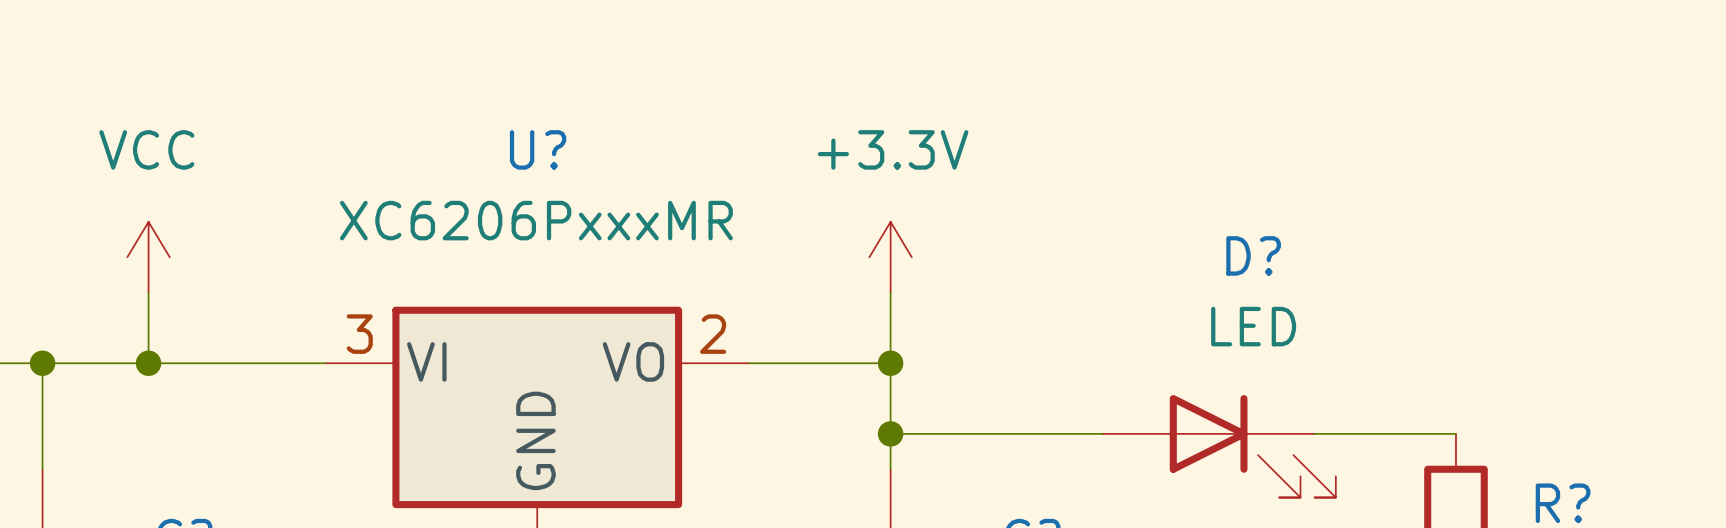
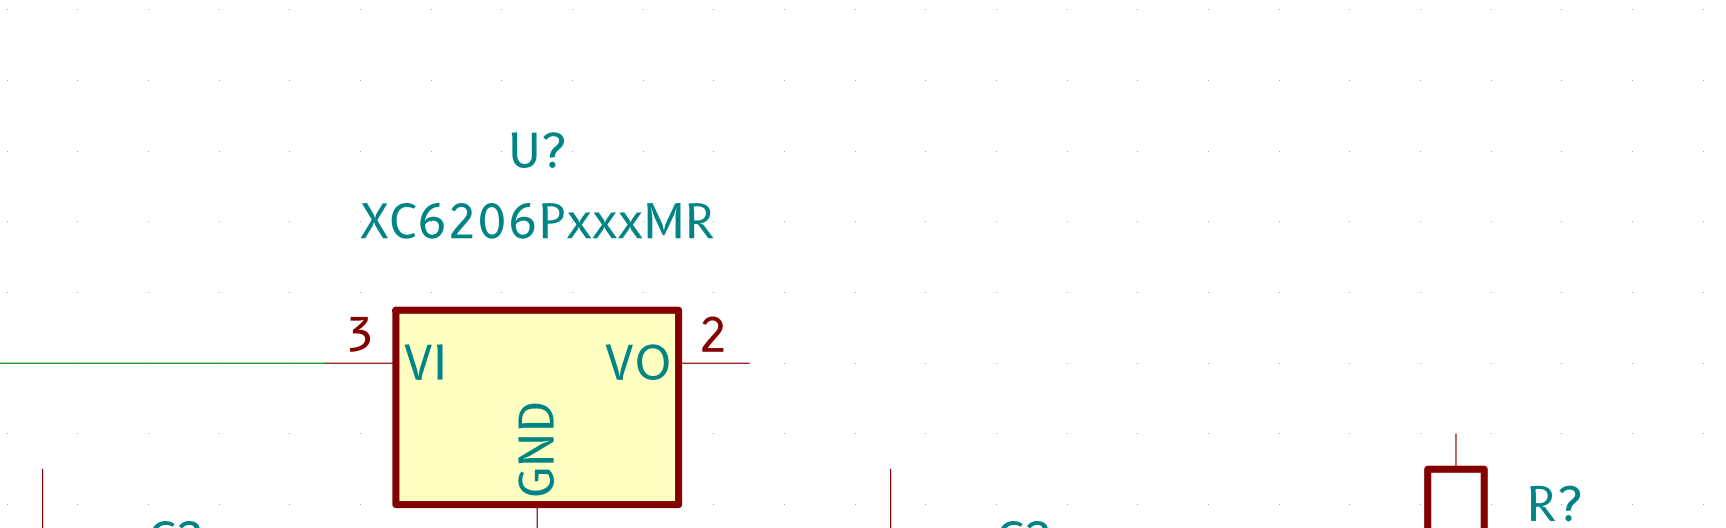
power symbol: VCC (148, 257) -> none
power symbol: +3.3V (890, 257) -> none
wire: (148, 292) (148, 363) -> none
wire: (890, 292) (890, 469) -> none
wire: (42, 363) (42, 469) -> none
junction: (42, 363) -> none
junction: (148, 363) -> none
wire: (749, 363) (890, 363) -> none
junction: (890, 363) -> none
wire: (890, 433) (1102, 433) -> none
junction: (890, 433) -> none
wire: (1314, 433) (1455, 433) -> none
D?: LED (1219, 446) -> none

